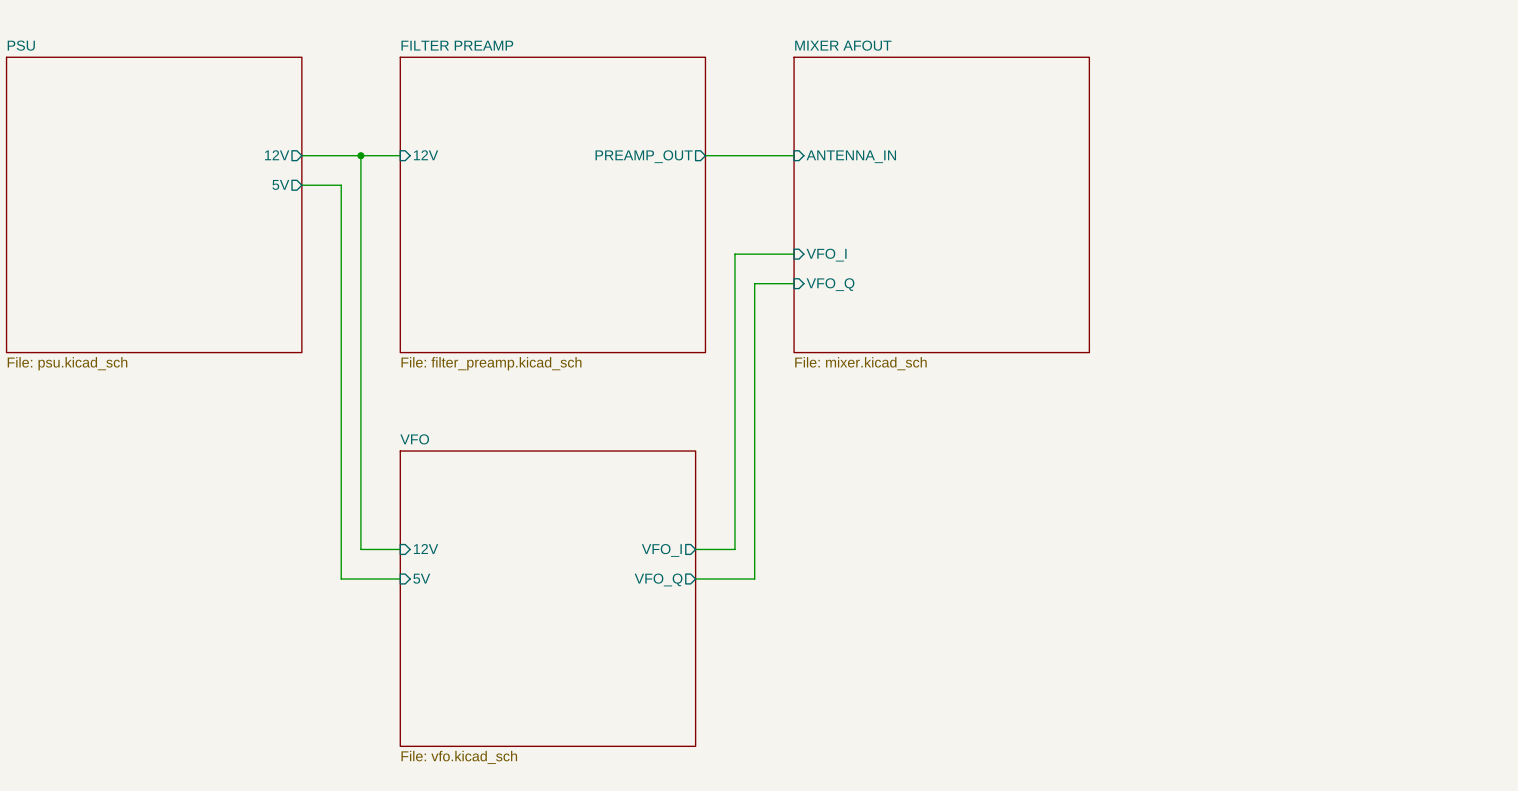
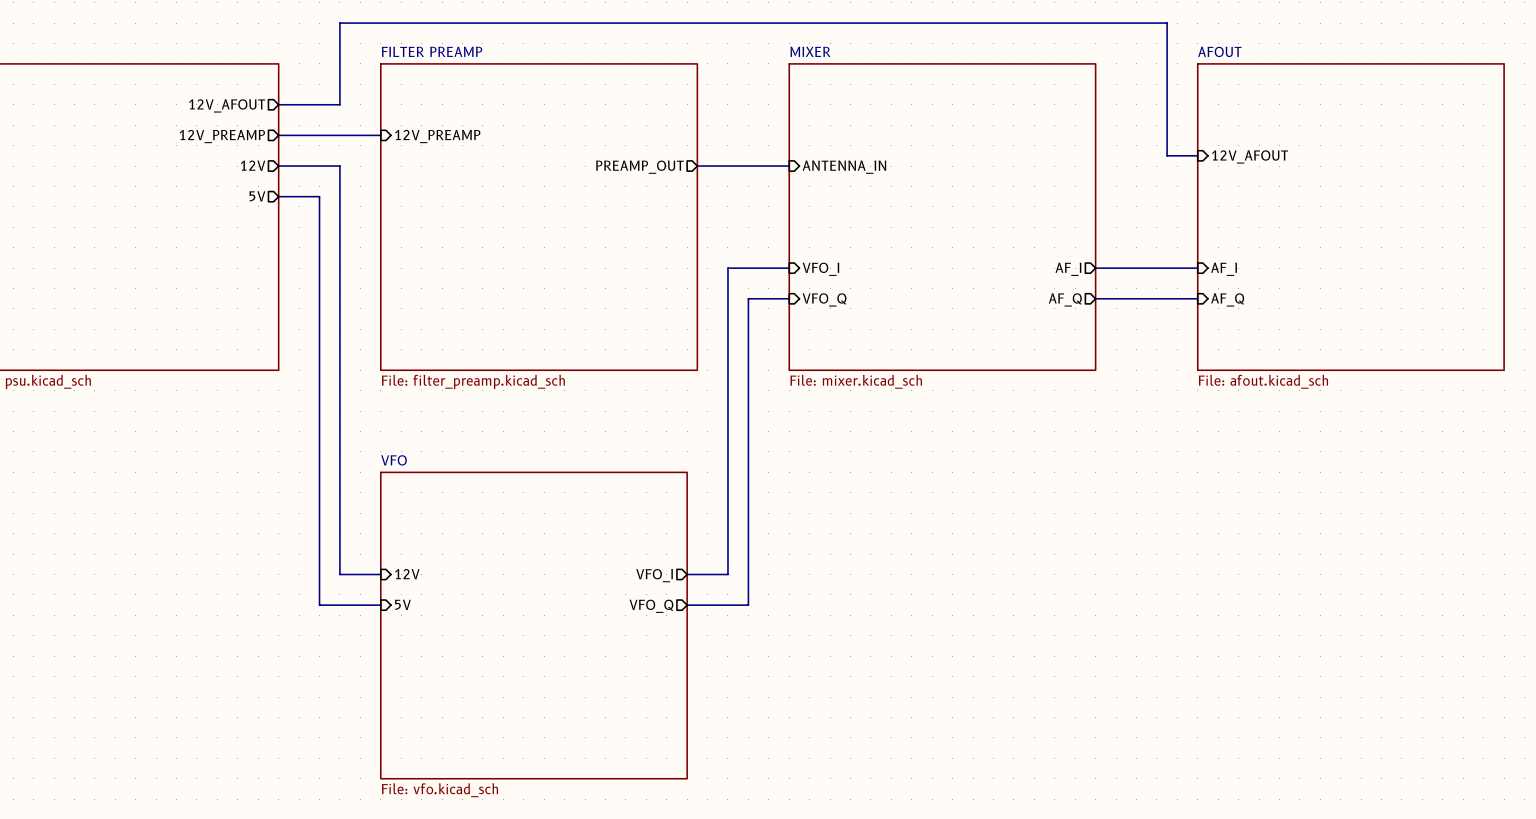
sheet MIXER AFOUT name: MIXER AFOUT (843, 45) -> MIXER (810, 51)
wire: none -> (278, 104) (339, 104) (339, 23) (1167, 23) (1167, 155) (1197, 155)
sheet pin: none -> 12V_AFOUT (227, 105)
wire: none -> (278, 135) (380, 135)
sheet pin: none -> 12V_PREAMP (222, 136)
sheet pin: none -> 12V_PREAMP (437, 136)
sheet pin: none -> 12V_AFOUT (1250, 156)
wire: (360, 155) (400, 155) -> none
junction: (360, 155) -> none
sheet pin: 12V (426, 155) -> none
sheet AFOUT: none -> File: afout.kicad_sch (1350, 217)
wire: none -> (1095, 268) (1197, 268)
sheet pin: none -> AF_I (1068, 269)
sheet pin: none -> AF_I (1224, 269)
wire: none -> (1095, 298) (1197, 298)
sheet pin: none -> AF_Q (1065, 299)
sheet pin: none -> AF_Q (1227, 299)

